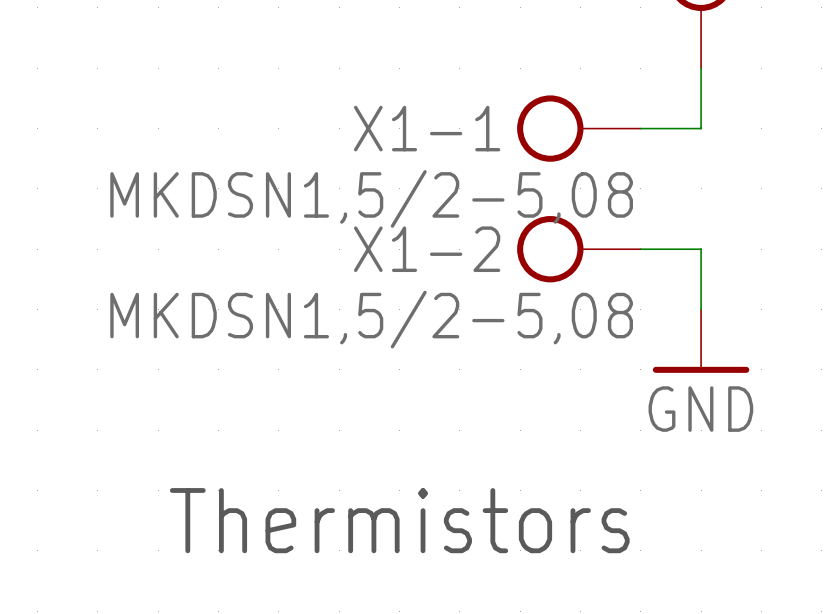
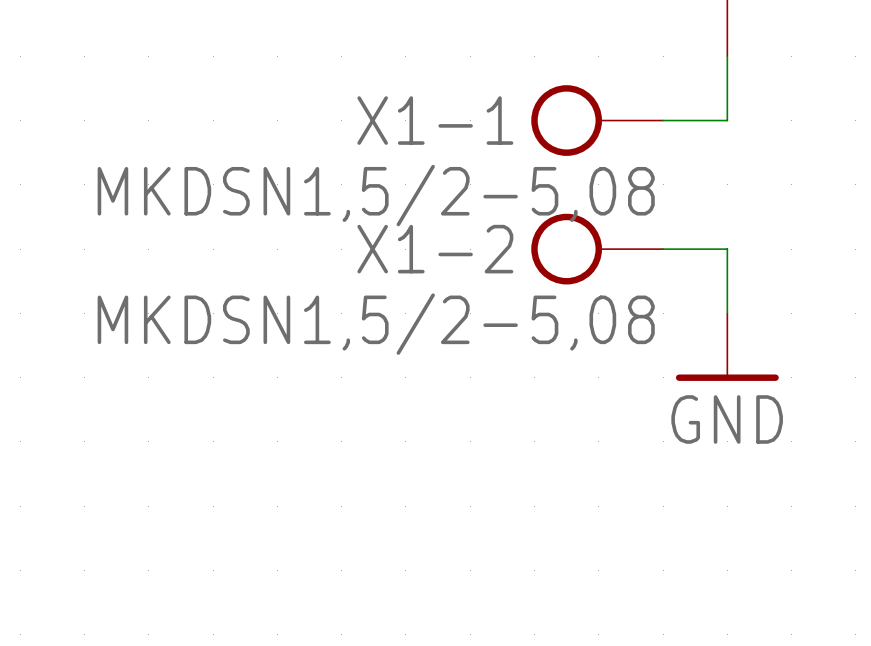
text: Thermistors (399, 520) -> none

